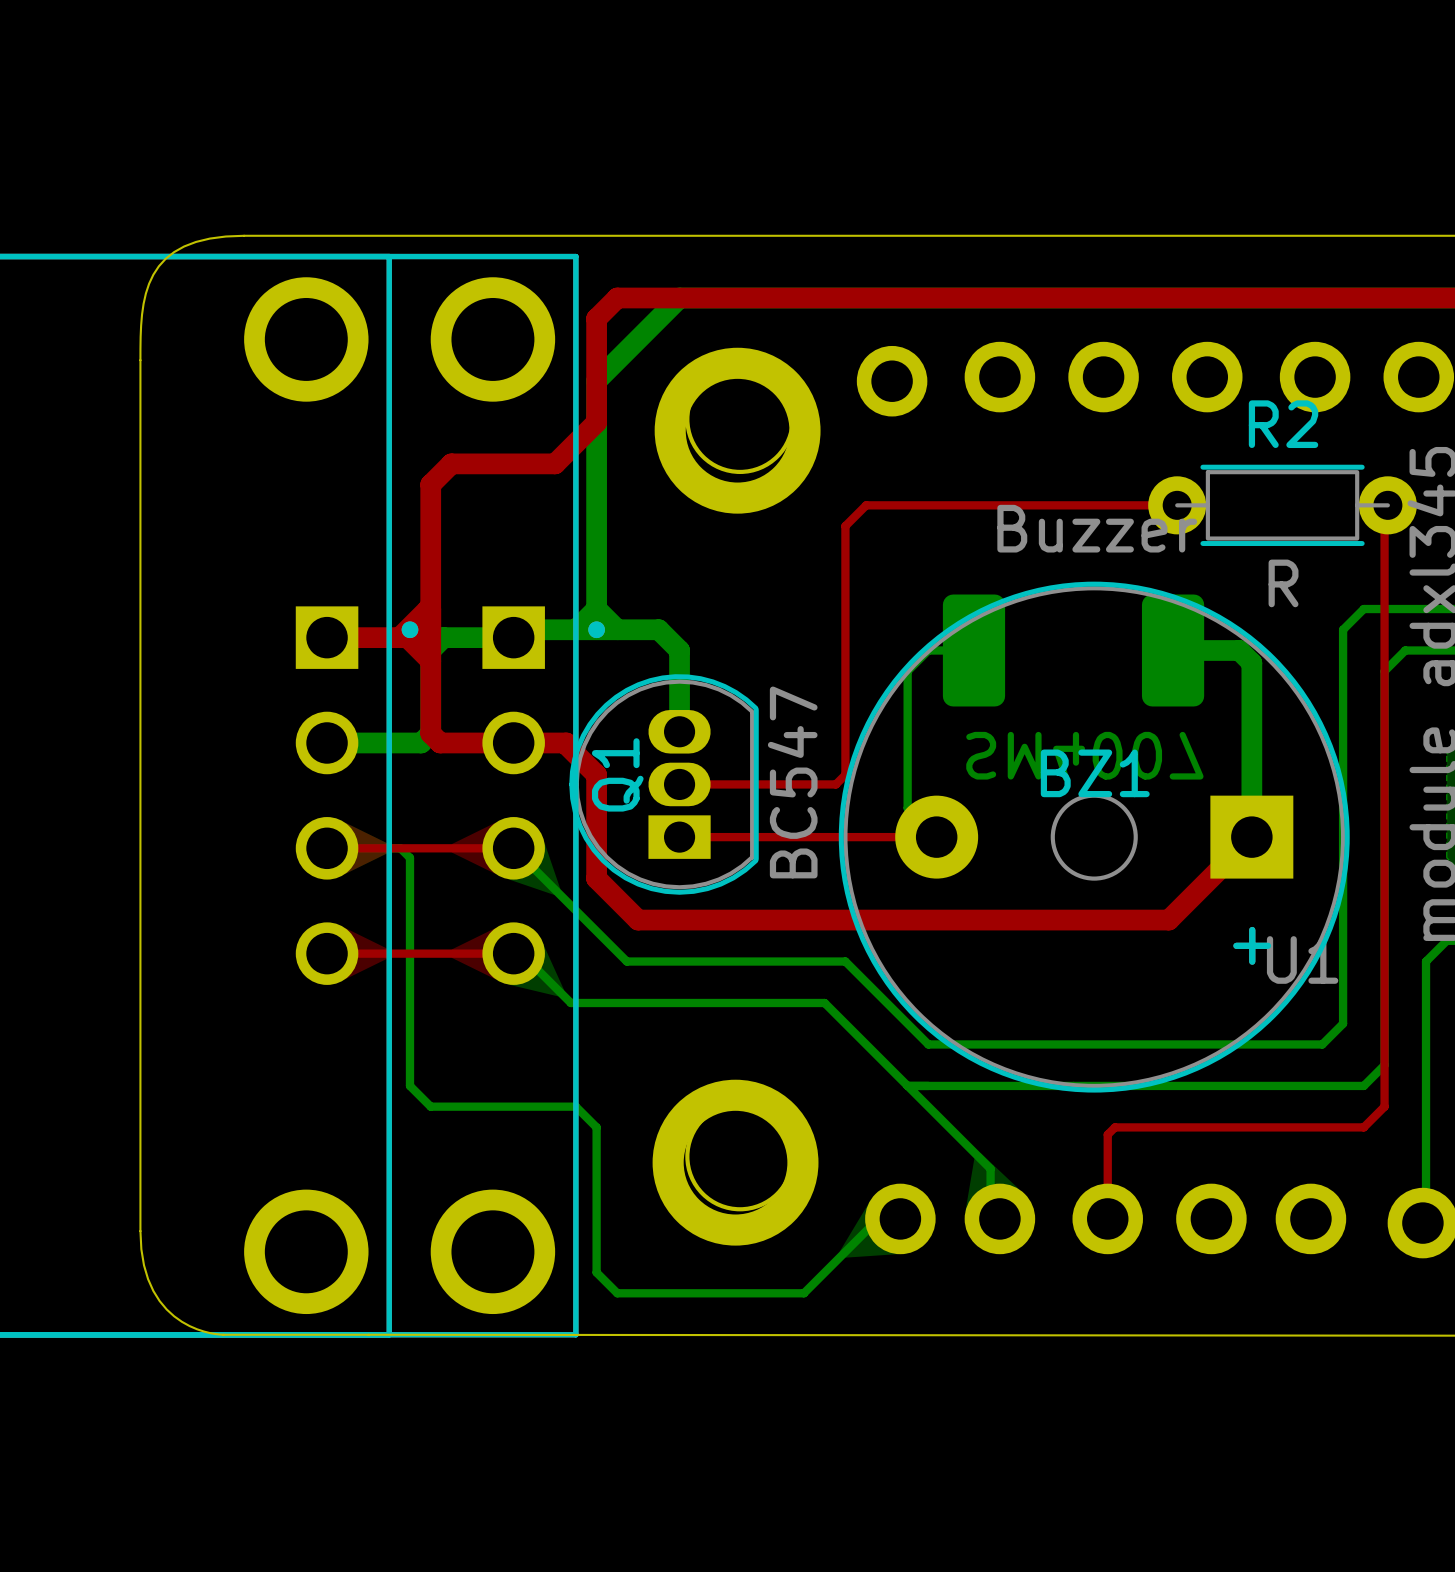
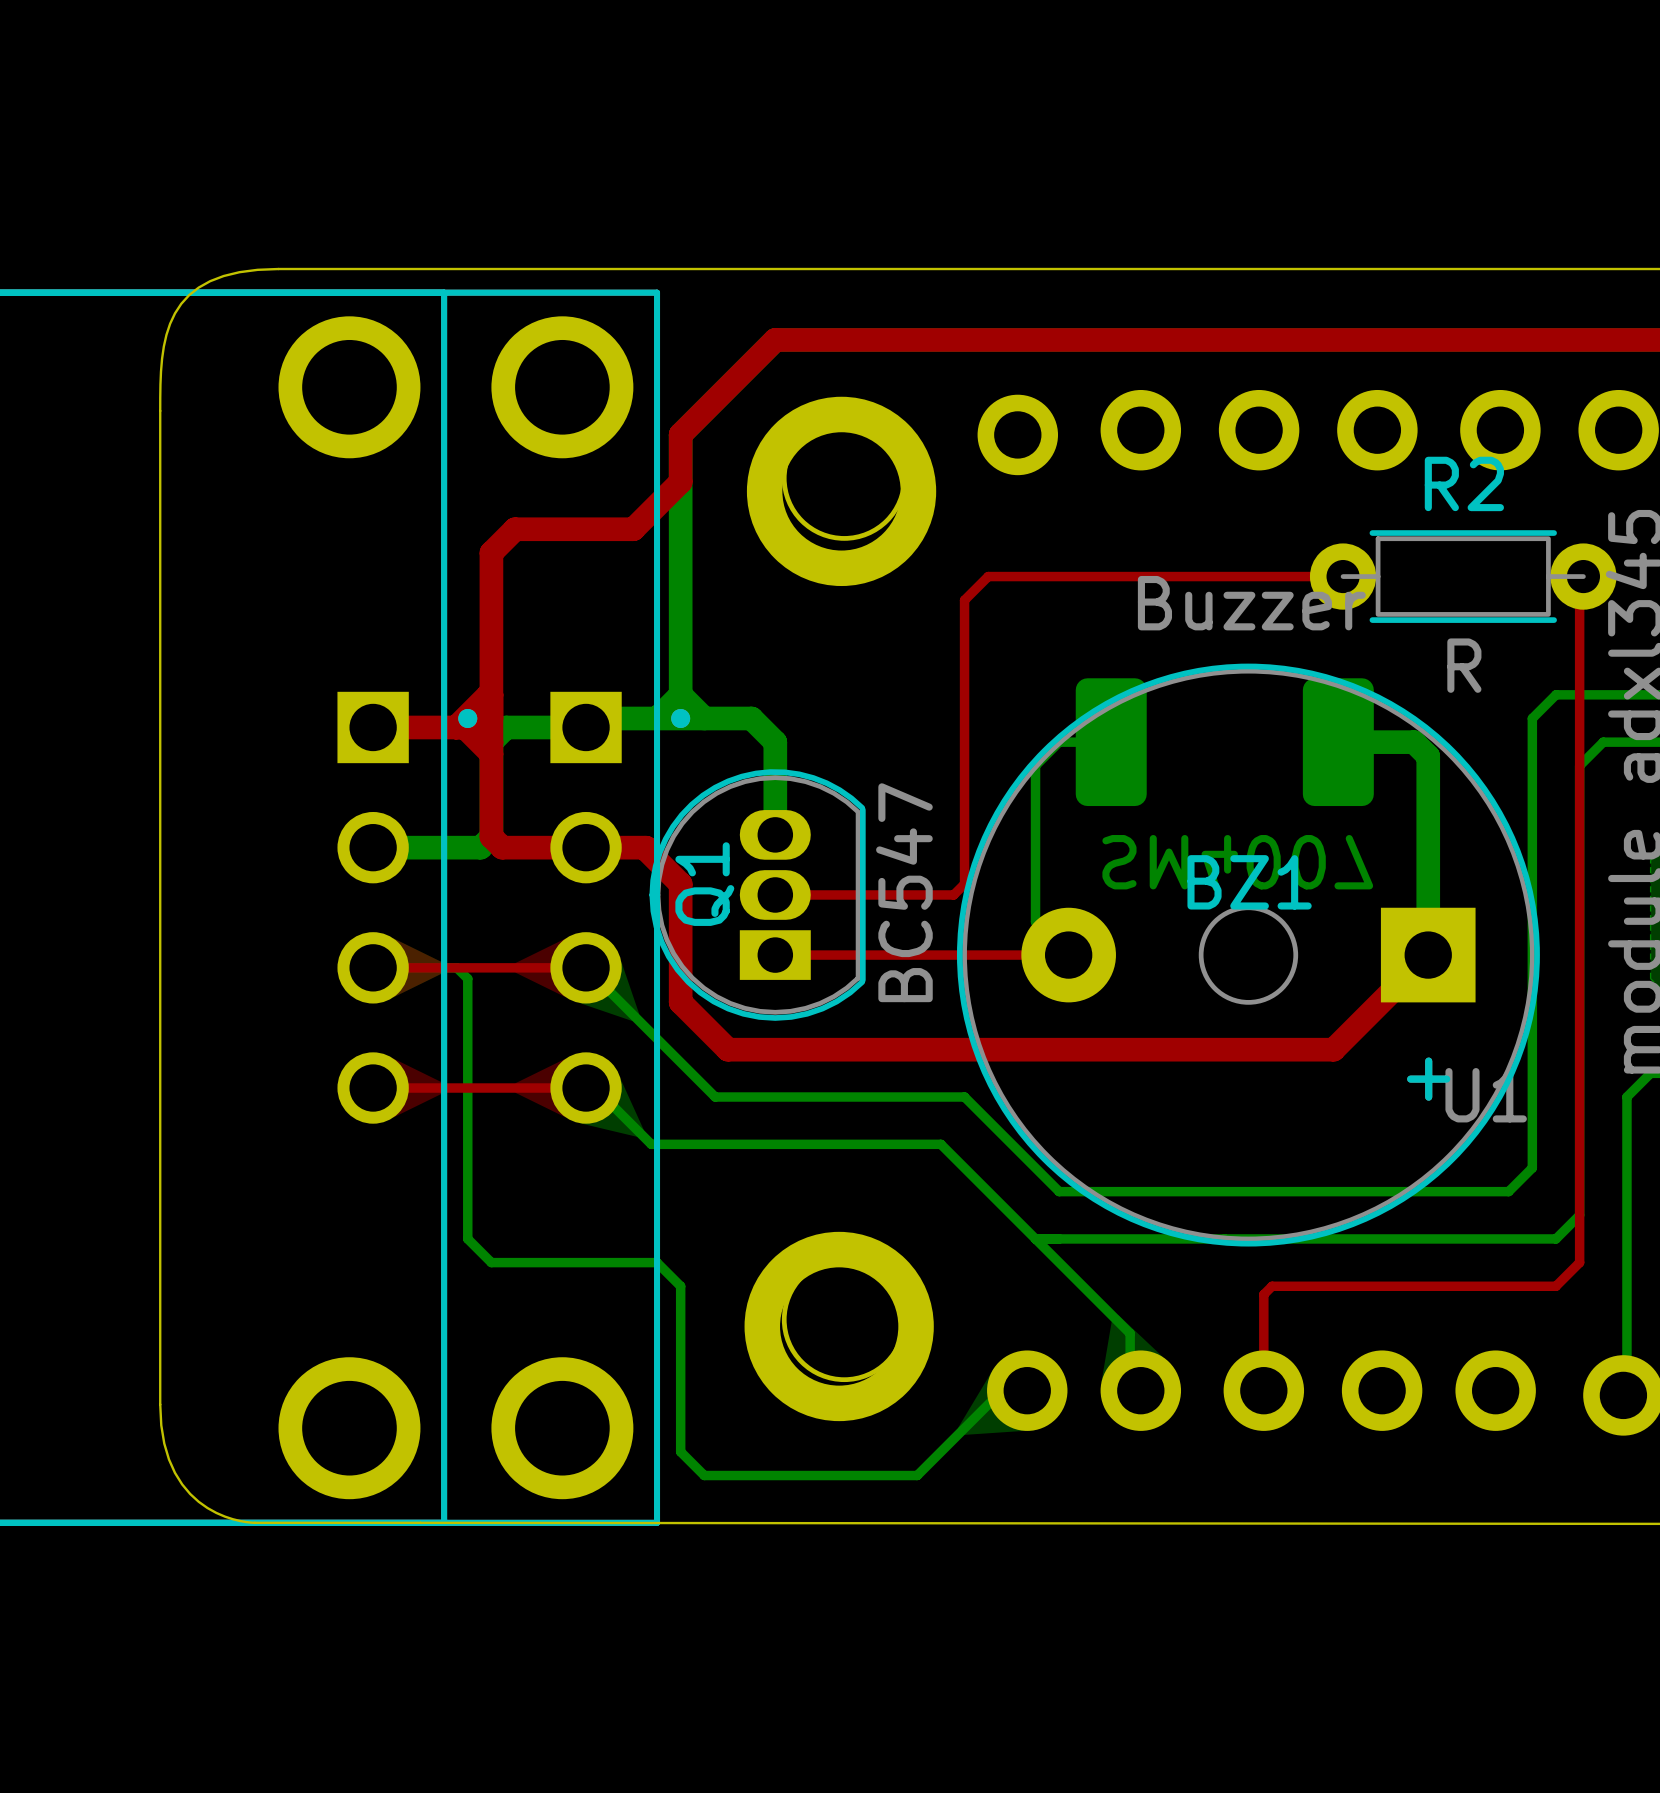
top track: (679, 297) (617, 297) (596, 318) (596, 380) -> (775, 339) (680, 434)

